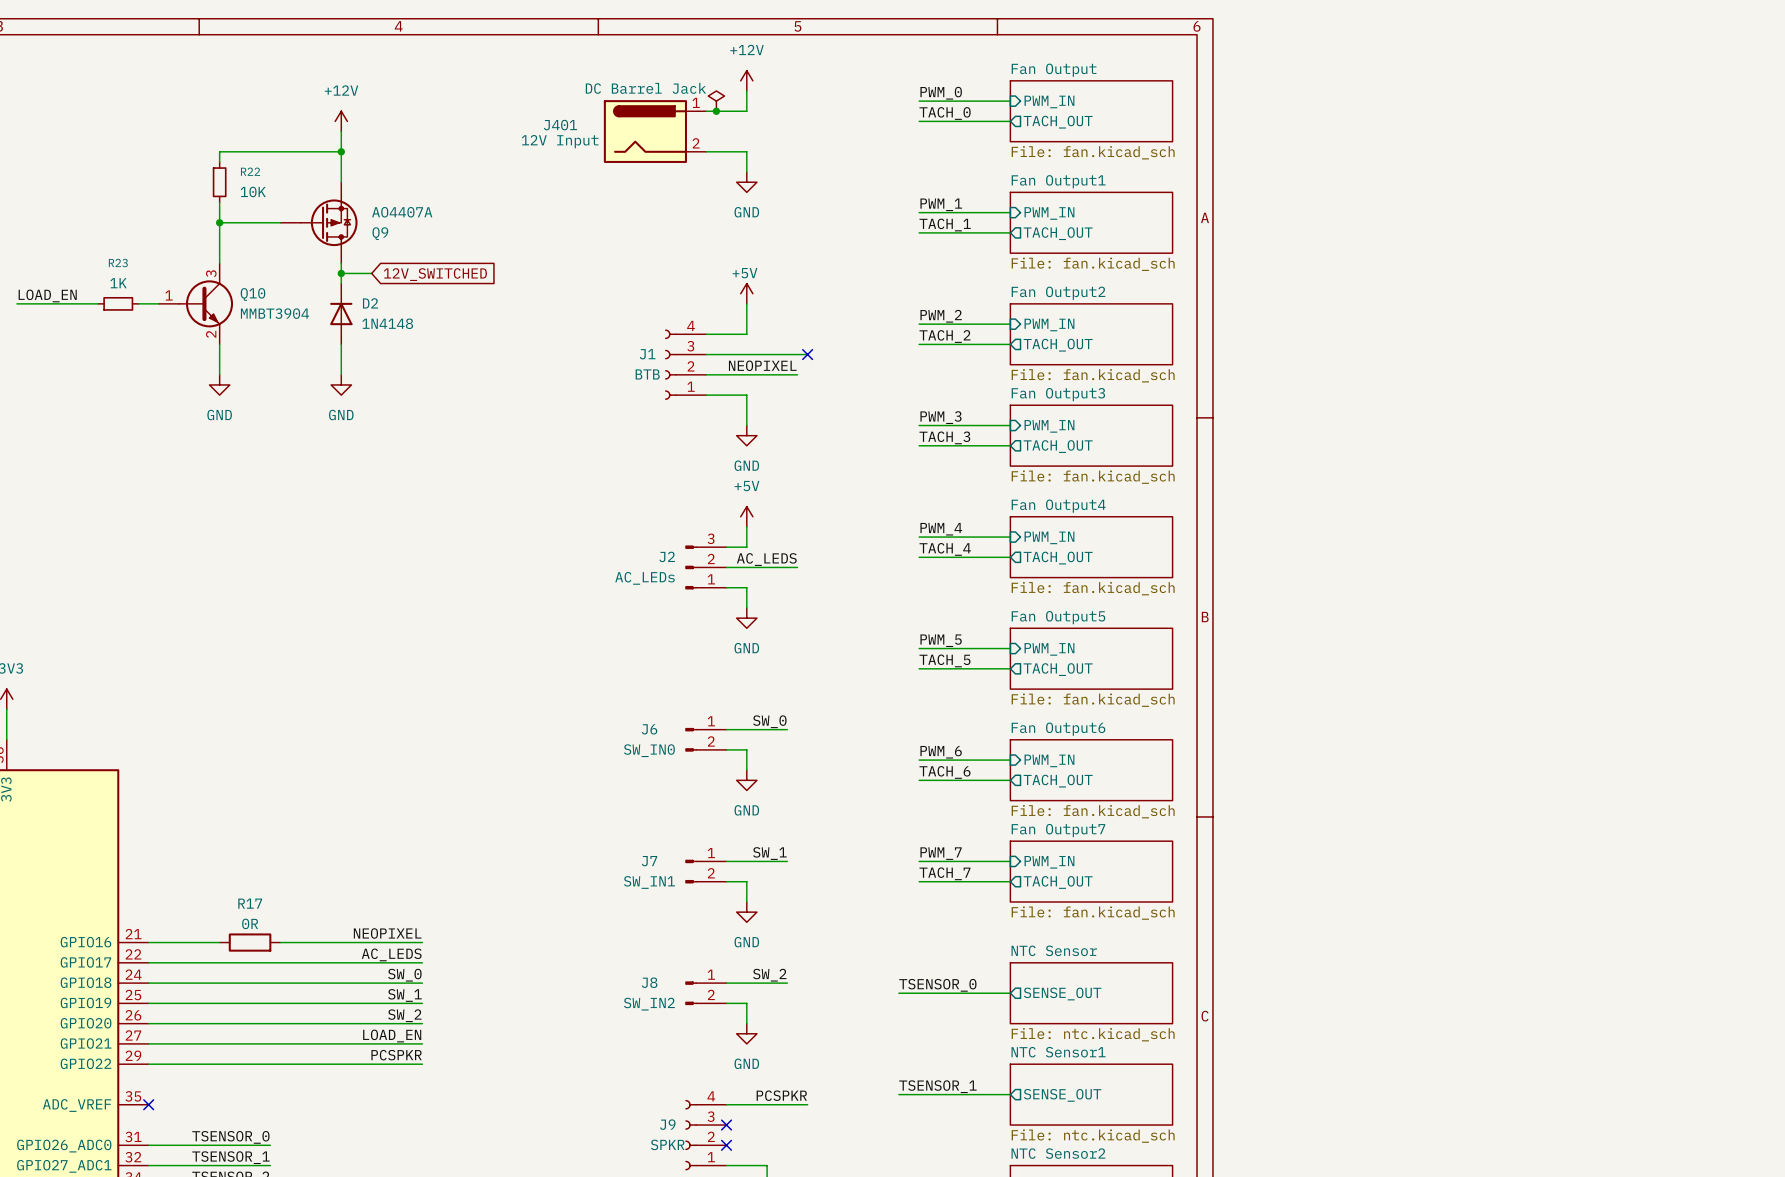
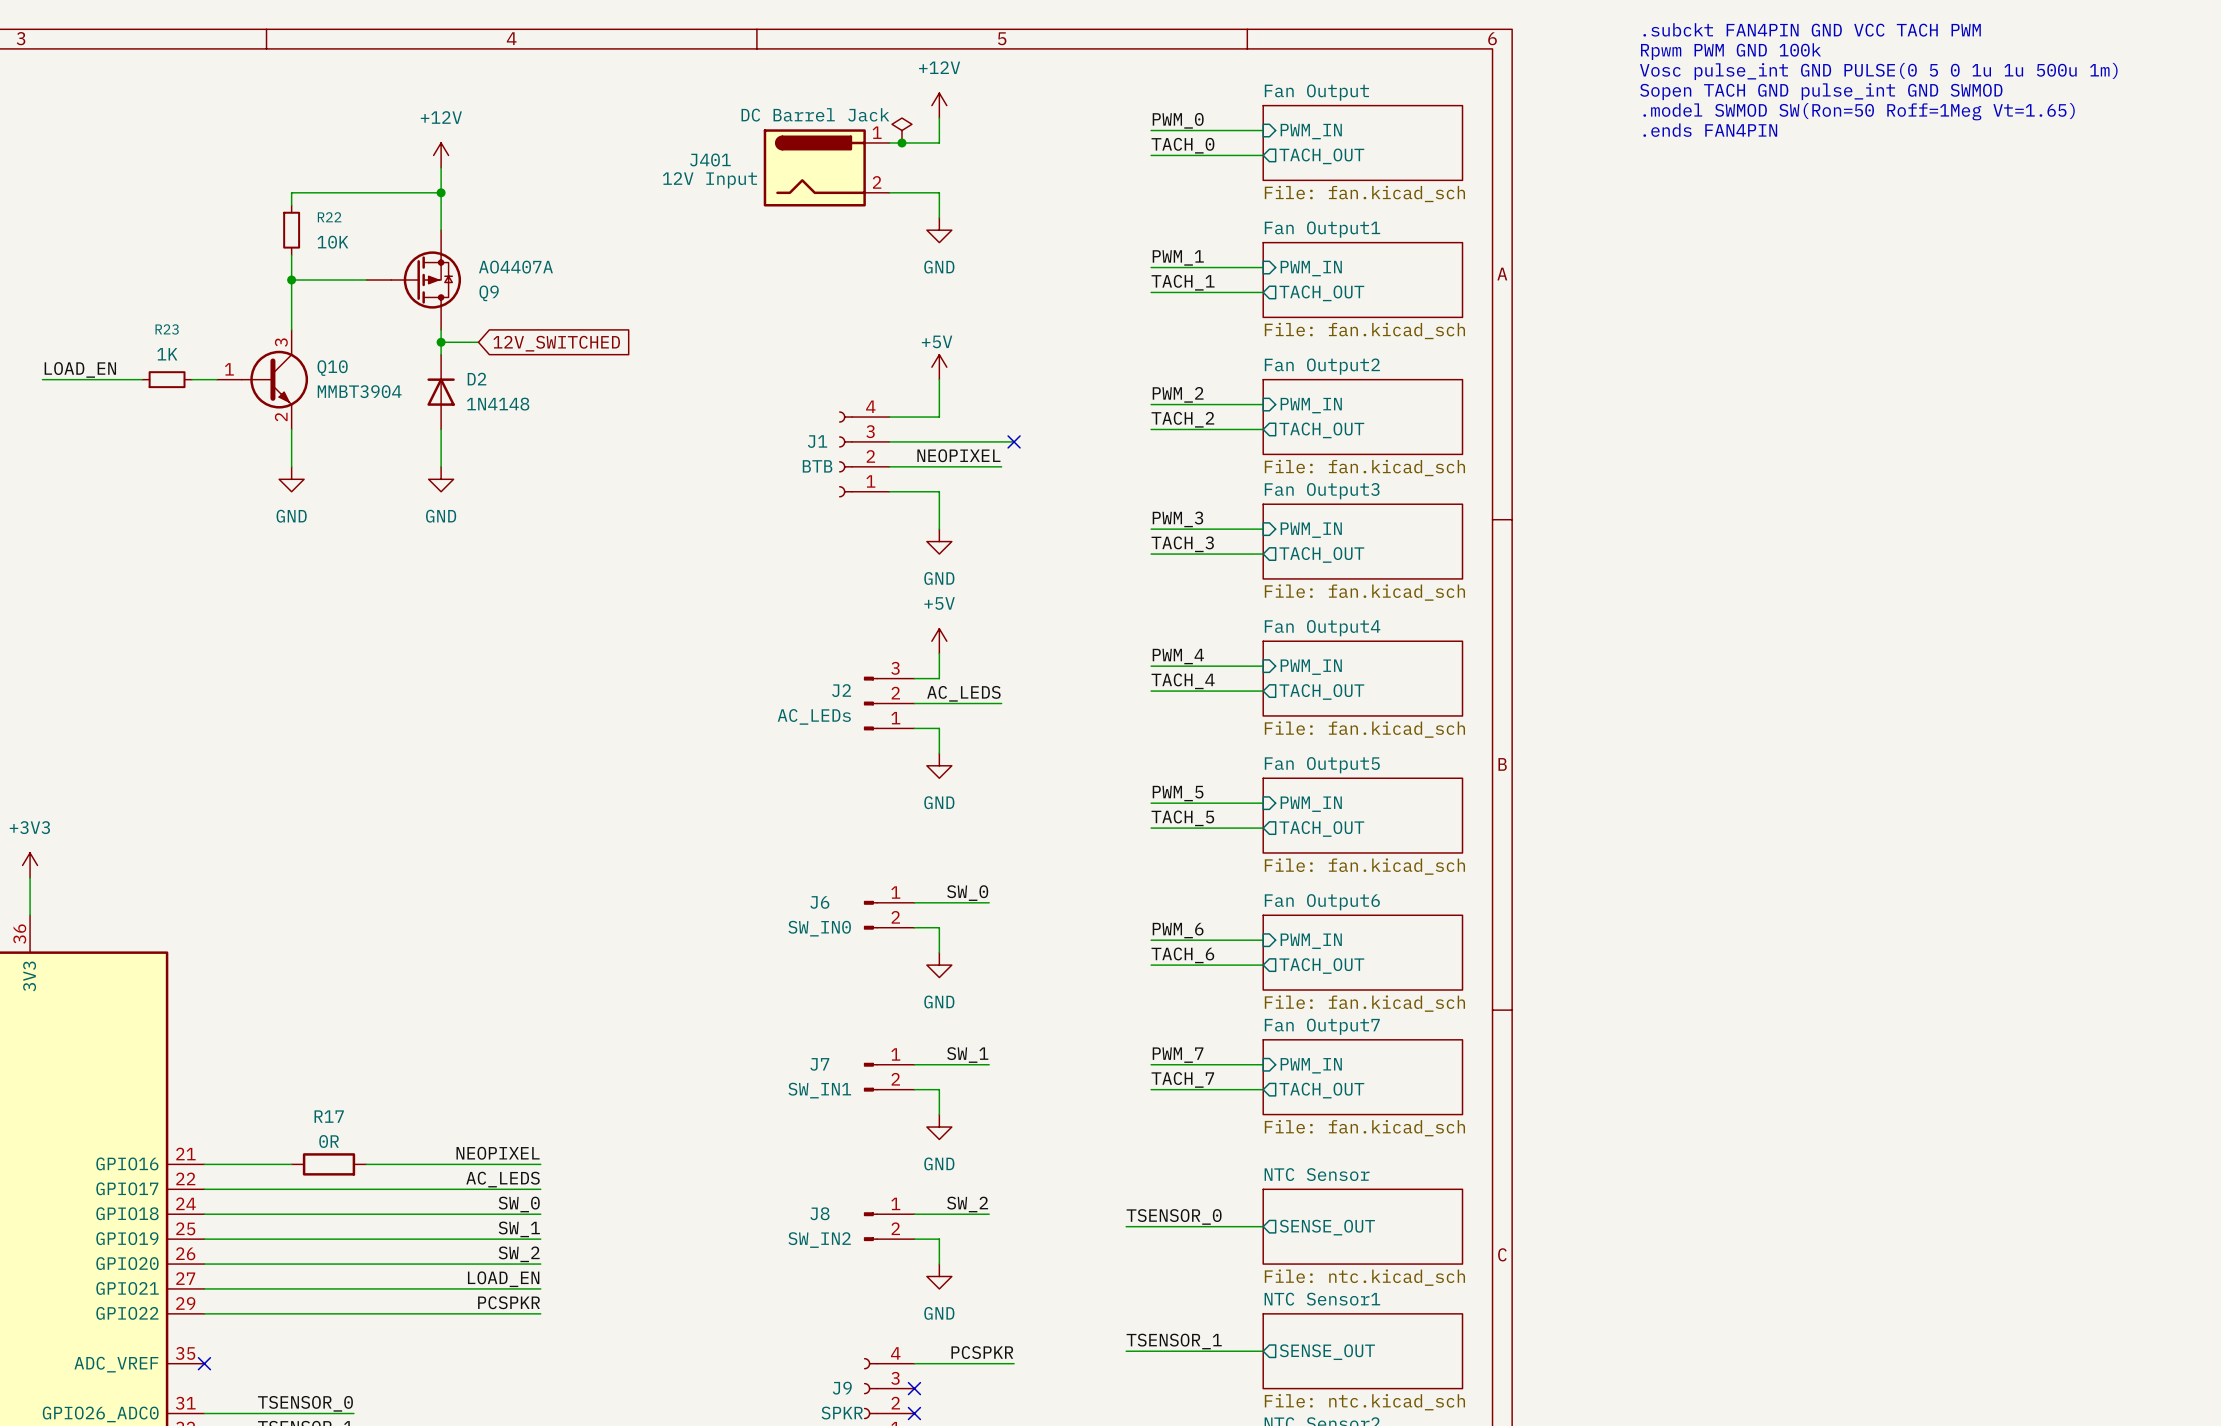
text: none -> .subckt FAN4PIN GND VCC TACH PWM (1812, 29)
text: none -> Rpwm PWM GND 100k (1730, 51)
text: none -> Vosc pulse_int GND PULSE(0 5 0 1u 1u 500u 1m) (1878, 71)
text: none -> Sopen TACH GND pulse_int GND SWMOD (1821, 91)
text: none -> .model SWMOD SW(Ron=50 Roff=1Meg Vt=1.65) (1859, 111)
text: none -> .ends FAN4PIN (1710, 130)

